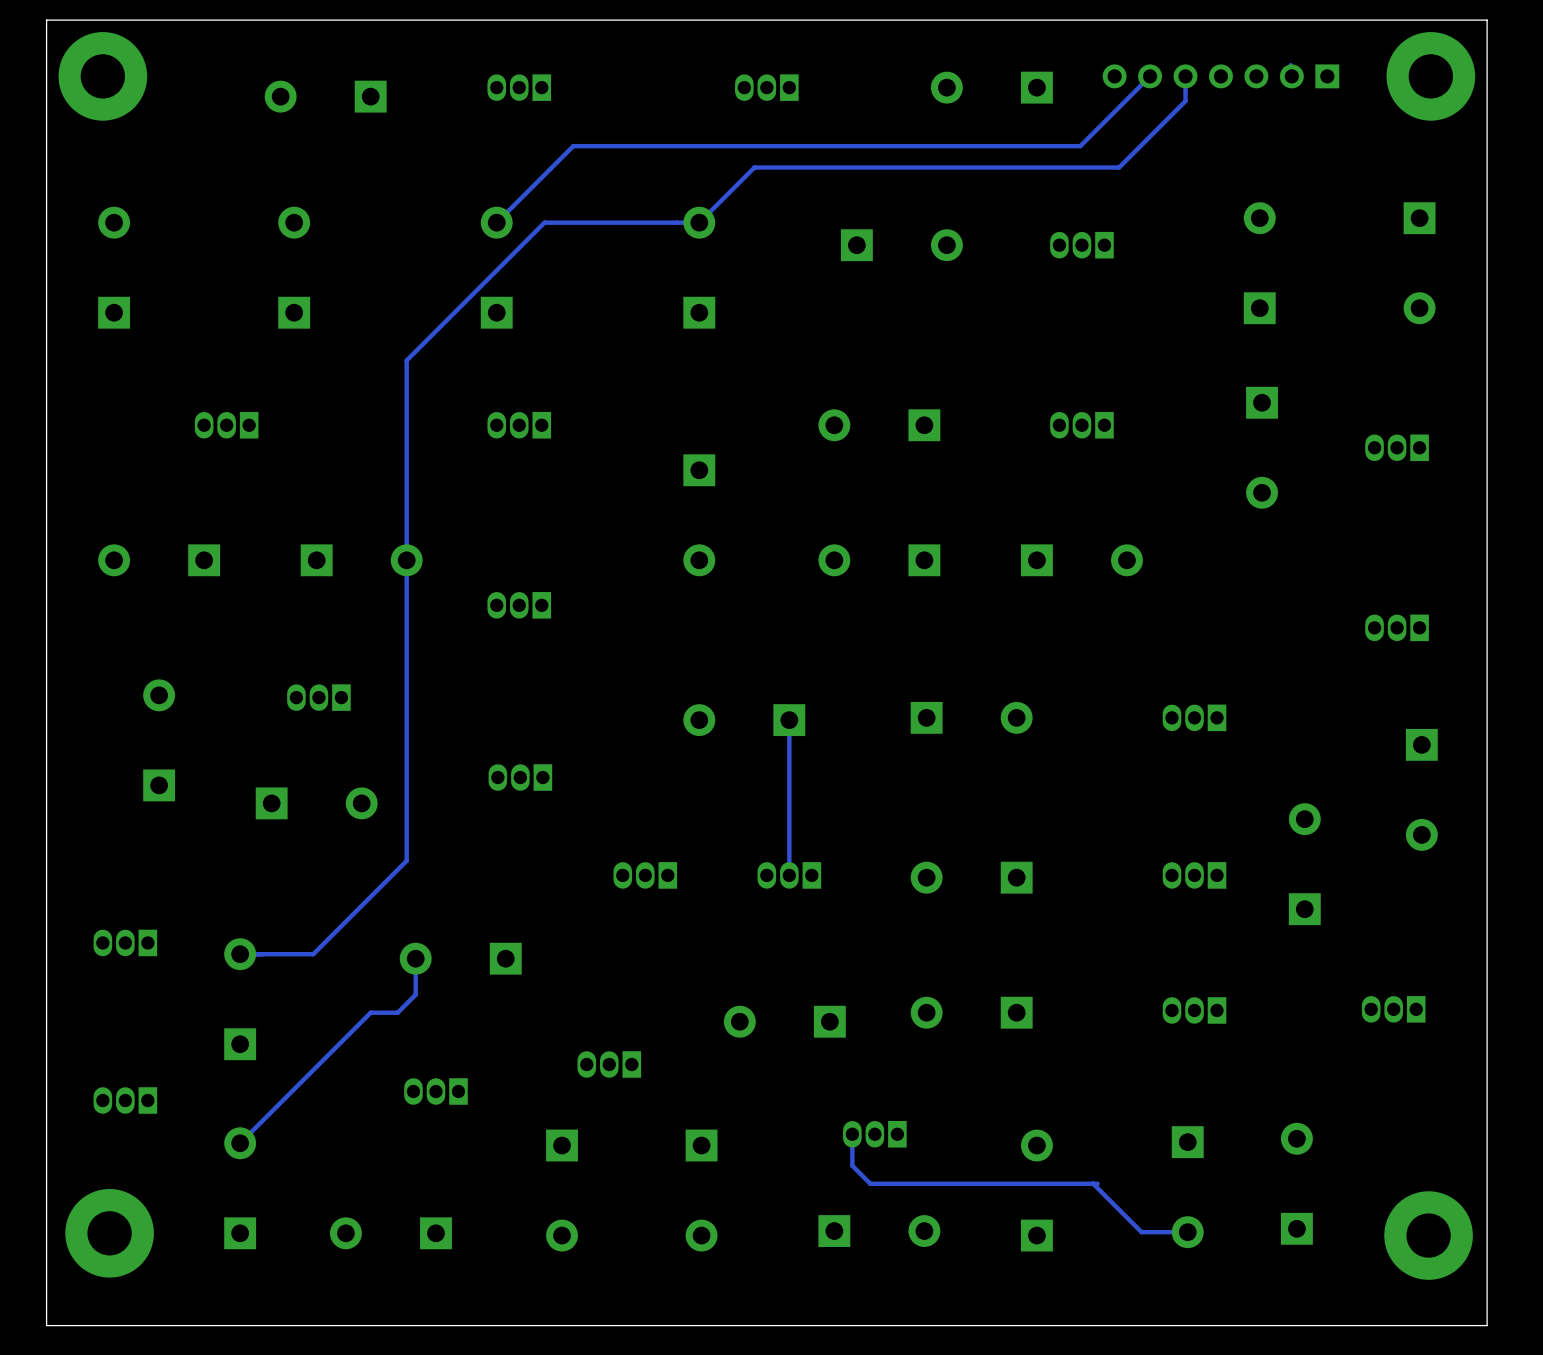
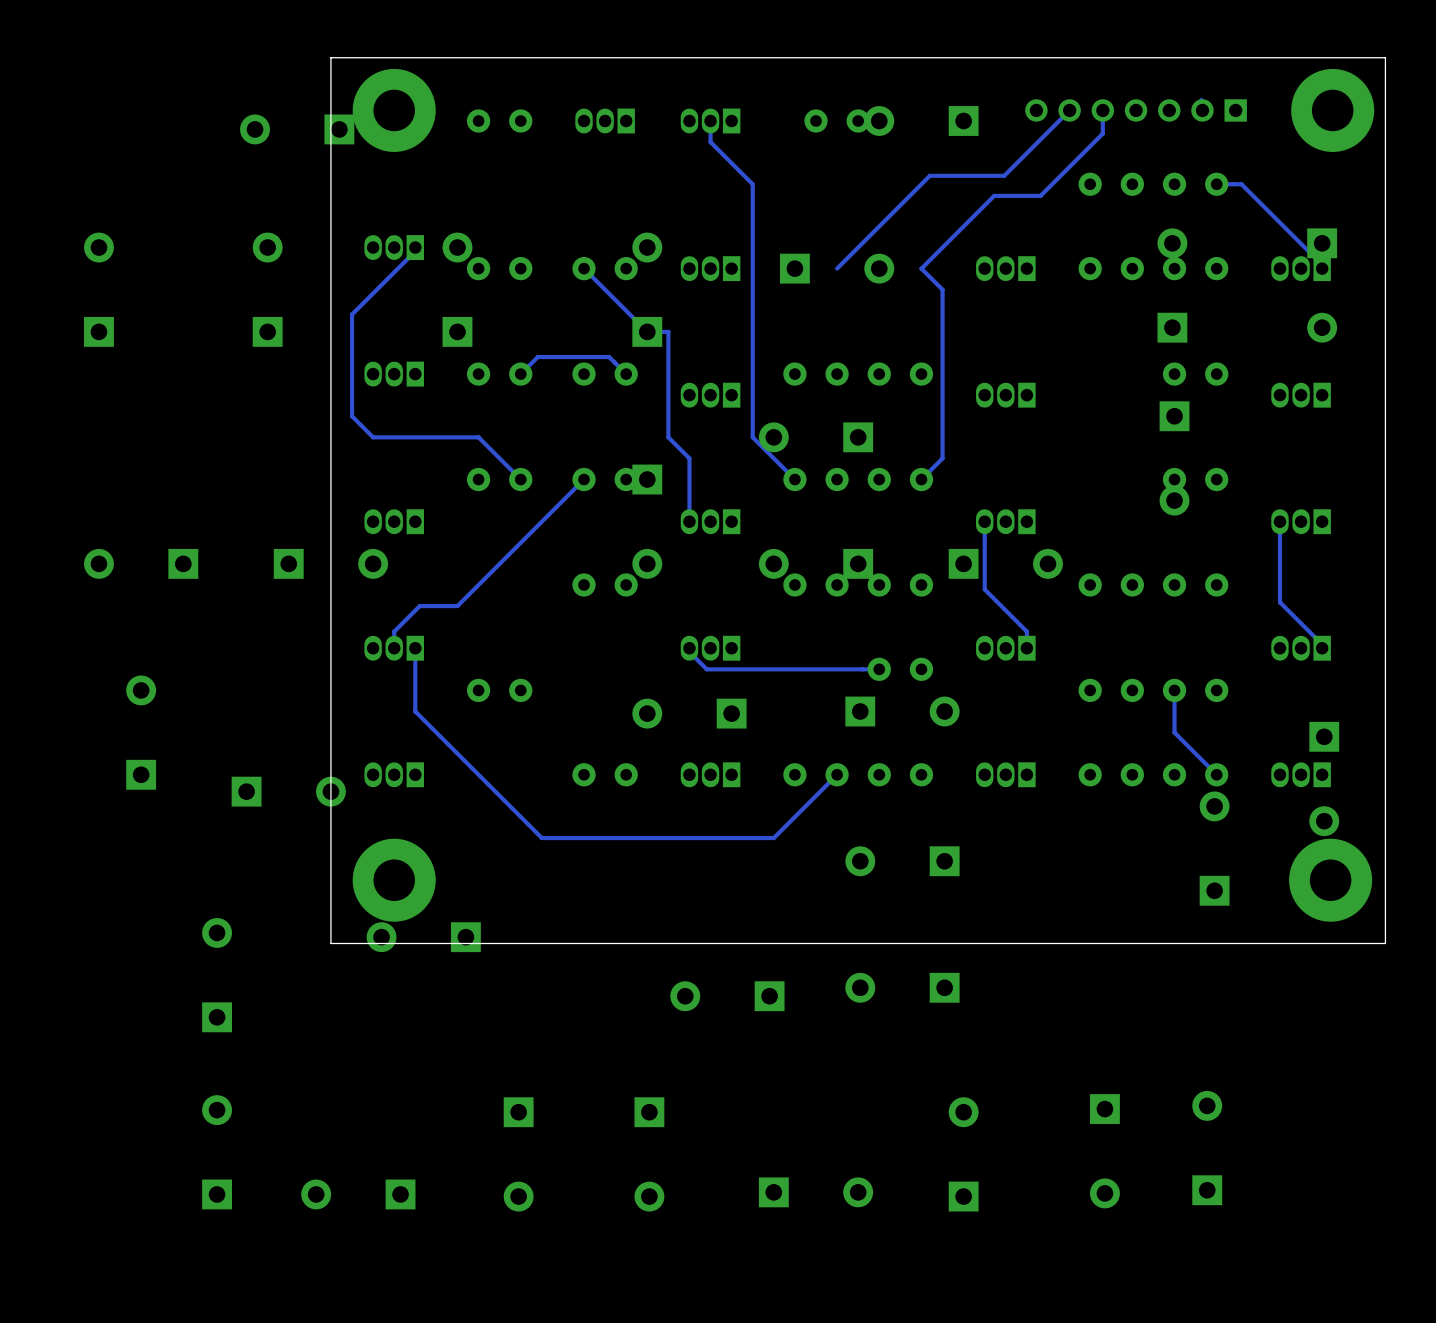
board edge: (361, 20) (46, 20) (46, 1325) (1487, 1325) (1487, 965) -> (330, 57) (330, 943) (1385, 943)
part position: (102, 76) -> (394, 110)
part: (519, 87) -> none
part: none -> (499, 121)
part: none -> (605, 121)
track: none -> (710, 121) (710, 142) (752, 184) (752, 437) (794, 479)
part: none -> (837, 121)
track: (1000, 146) (573, 146) (496, 222) -> (929, 175) (837, 268)
part: none -> (1111, 184)
part: none -> (1195, 184)
track: none -> (1216, 184) (1241, 184) (1322, 264) (1322, 268)
track: (1069, 167) (754, 167) (699, 222) (544, 222) (406, 360) (406, 860) (313, 954) (240, 954) -> (994, 195) (921, 268) (942, 289) (942, 458) (921, 479)
part: none -> (394, 247)
track: none -> (415, 247) (415, 251) (352, 314) (352, 416) (373, 437) (478, 437) (520, 479)
part: none -> (499, 268)
track: none -> (584, 268) (647, 331) (668, 331) (668, 437) (689, 458) (689, 521)
part: none -> (605, 268)
part: none -> (710, 268)
part: none -> (1111, 268)
part: none -> (1195, 268)
part: none -> (1301, 268)
part: none -> (394, 374)
part: none -> (499, 374)
part: none -> (605, 374)
track: none -> (626, 374) (609, 357) (537, 357) (520, 374)
part: none -> (816, 374)
part: none -> (900, 374)
part: none -> (1195, 374)
part: none -> (710, 395)
part: none -> (1005, 395)
part: none -> (1301, 395)
part: (226, 425) -> none
part: (519, 425) -> none
part: (1081, 425) -> none
part: (1397, 447) -> none
part: none -> (499, 479)
track: none -> (584, 479) (457, 606) (419, 606) (394, 631) (394, 648)
part: none -> (605, 479)
part: none -> (816, 479)
part: none -> (900, 479)
part: none -> (1195, 479)
part: none -> (394, 521)
part: none -> (710, 521)
track: none -> (984, 521) (984, 589) (1026, 631) (1026, 648)
part: none -> (1005, 521)
track: none -> (1279, 521) (1279, 602) (1322, 644) (1322, 648)
part: none -> (1301, 521)
part: none -> (605, 584)
part: none -> (816, 584)
part: none -> (900, 584)
part: none -> (1111, 584)
part: none -> (1195, 584)
part: (519, 605) -> none
part position: (1397, 627) -> (1301, 648)
part: none -> (394, 648)
track: none -> (415, 648) (415, 711) (541, 838) (773, 838) (837, 774)
track: none -> (689, 648) (689, 651) (706, 669) (879, 669)
part: none -> (710, 648)
part: none -> (1005, 648)
part: none -> (900, 669)
part: none -> (499, 690)
part: none -> (1111, 690)
track: none -> (1174, 690) (1174, 732) (1216, 774)
part: none -> (1195, 690)
part: (318, 697) -> none
part: (1194, 717) -> none
track: (789, 720) (789, 875) -> none
part: (520, 777) -> none
part: none -> (394, 774)
part: none -> (605, 774)
part: none -> (710, 774)
part: none -> (816, 774)
part: none -> (900, 774)
part: none -> (1005, 774)
part: none -> (1111, 774)
part: none -> (1195, 774)
part: none -> (1301, 774)
part: (645, 875) -> none
part: (789, 875) -> none
part: (1194, 875) -> none
part: none -> (394, 880)
part: (125, 942) -> none
track: (415, 958) (415, 994) (397, 1012) (370, 1012) (240, 1143) -> none
part: (1393, 1009) -> none
part: (1194, 1010) -> none
part: (609, 1064) -> none
part: (435, 1091) -> none
part: (125, 1100) -> none
track: (852, 1134) (852, 1165) (870, 1183) (1097, 1183) -> none
part: (874, 1134) -> none
track: (1093, 1183) (1141, 1232) (1187, 1232) -> none
part: (109, 1233) -> none
part position: (1428, 1235) -> (1330, 880)

